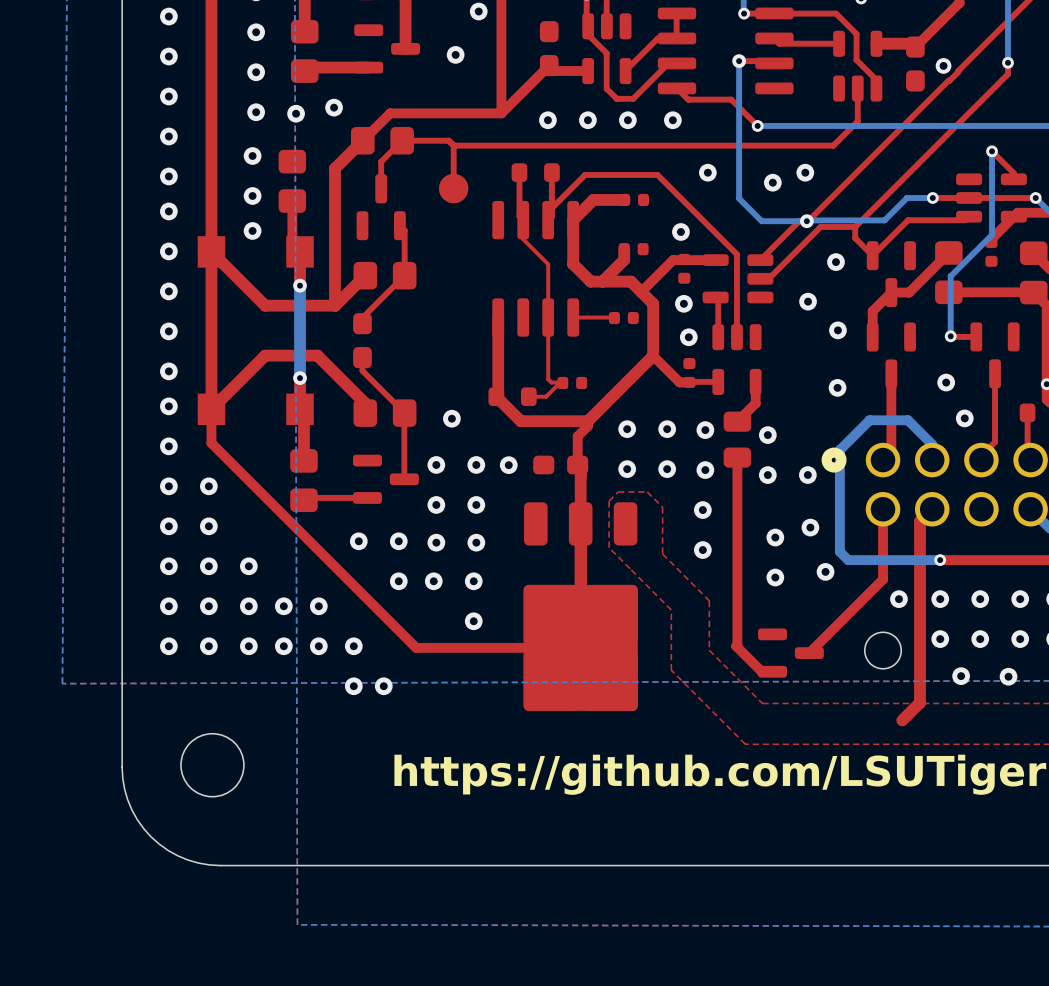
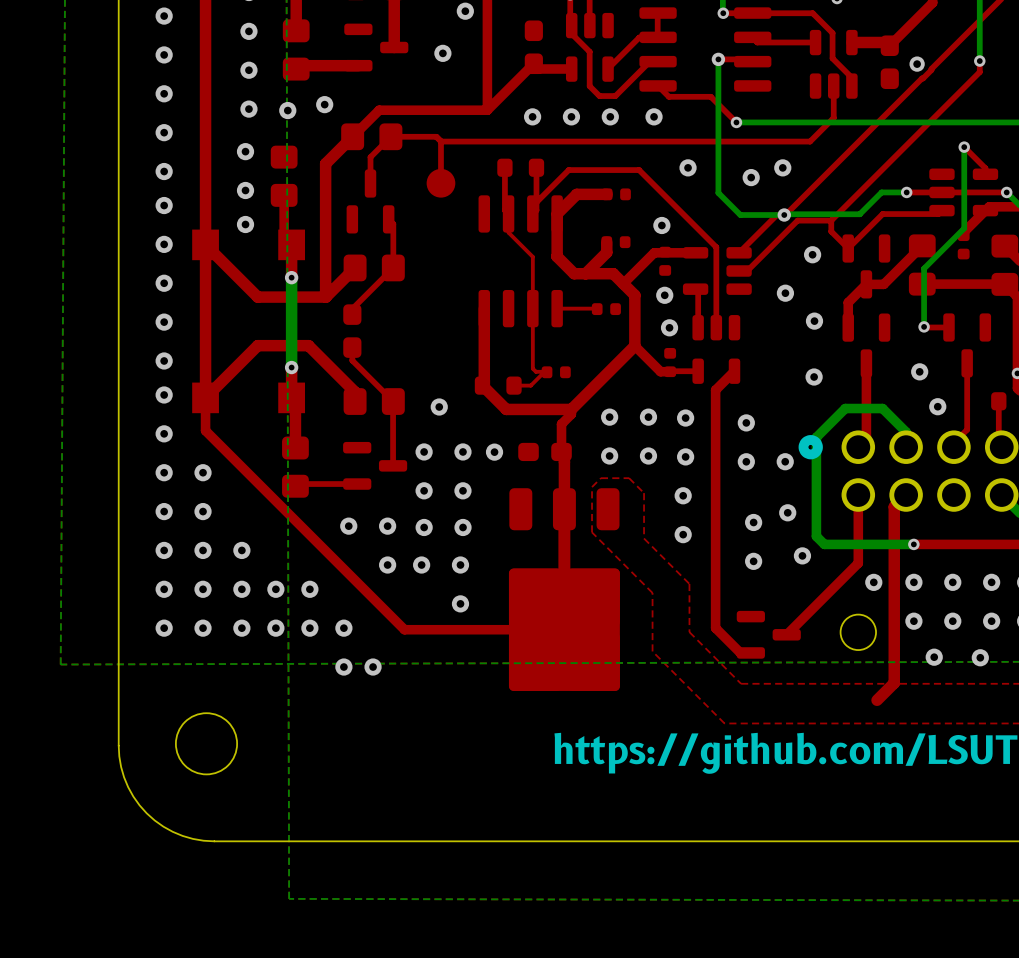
top track: (755, 381) (755, 403) (737, 421) -> none
part: (737, 439) -> none
top track: (737, 457) (736, 646) -> (734, 371) (715, 390) (715, 628)

